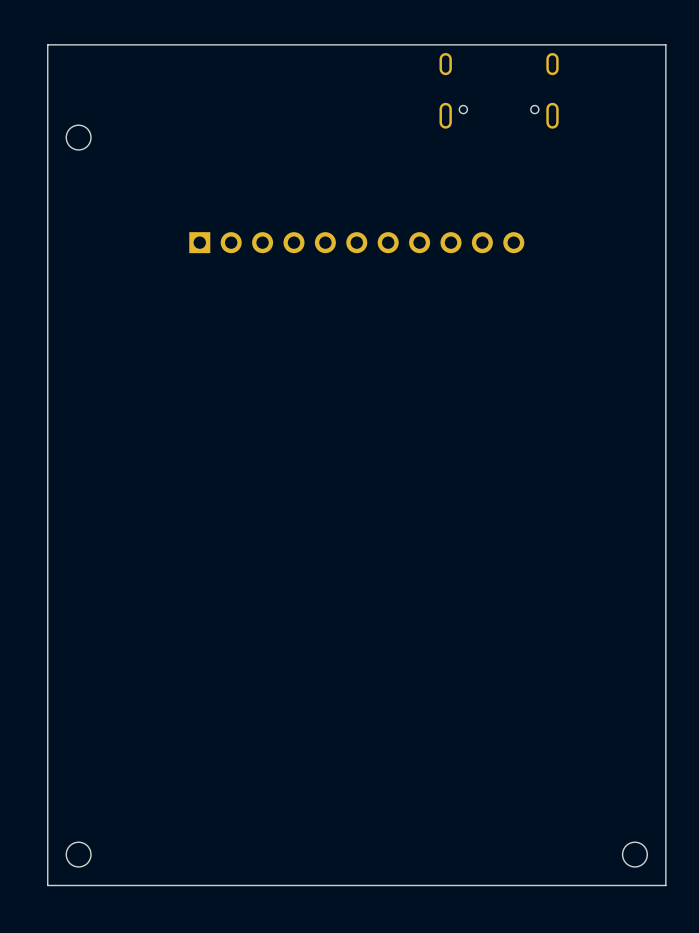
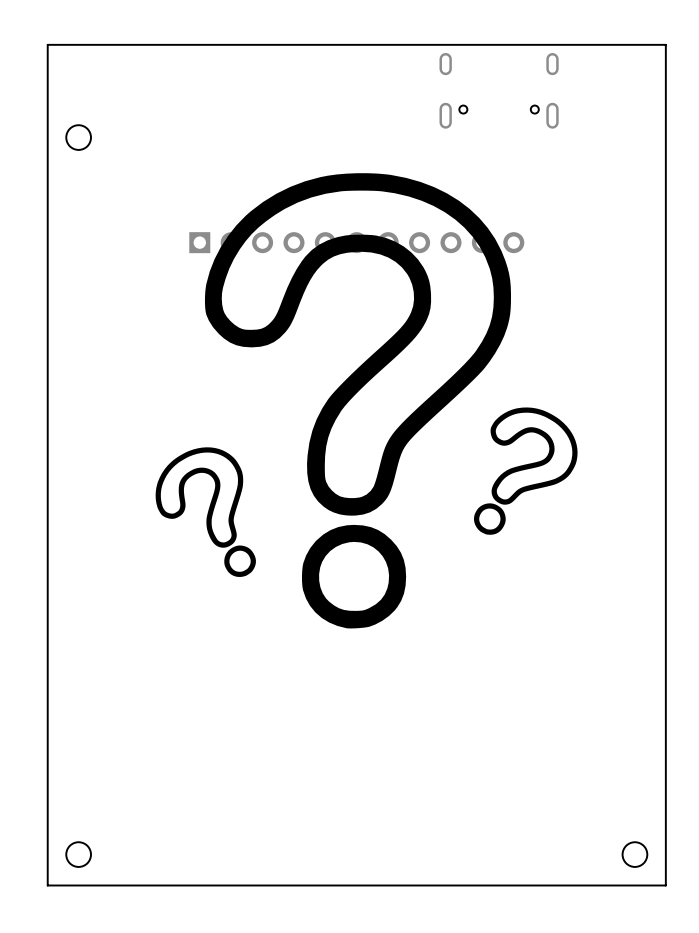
drawing: none -> [155, 173, 578, 629]

